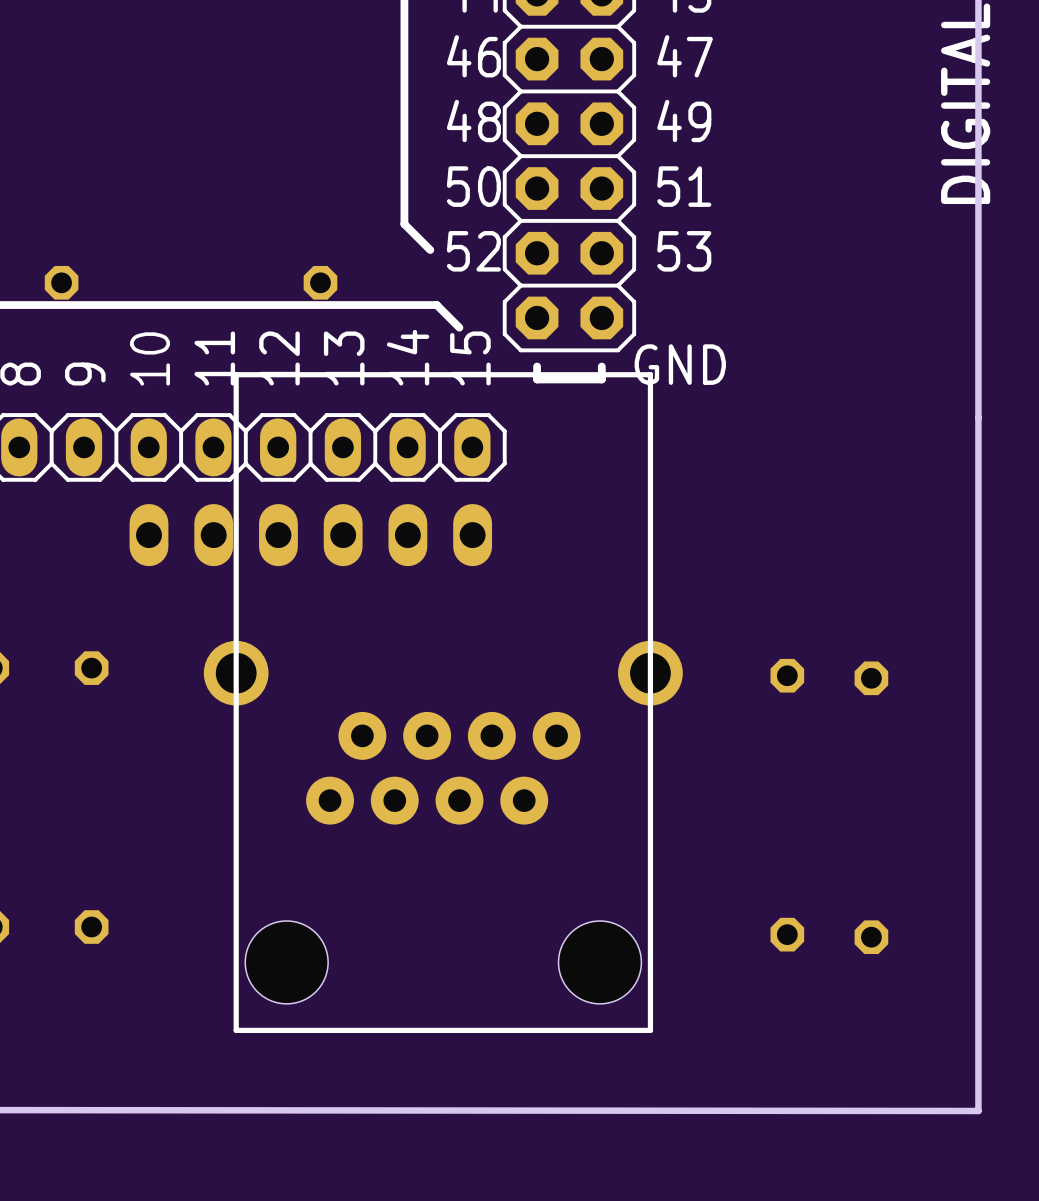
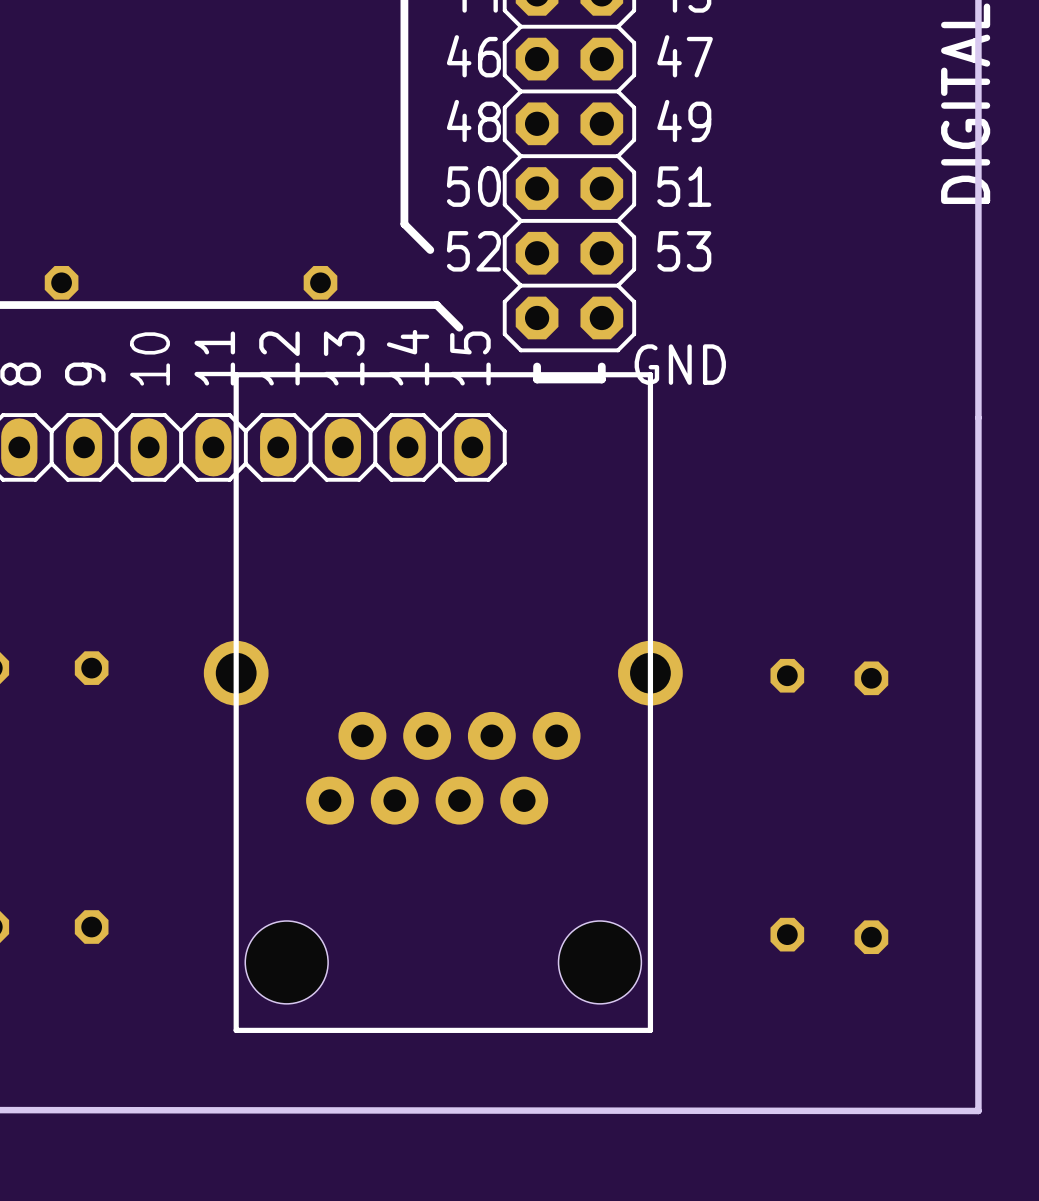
part: (310, 535) -> none

